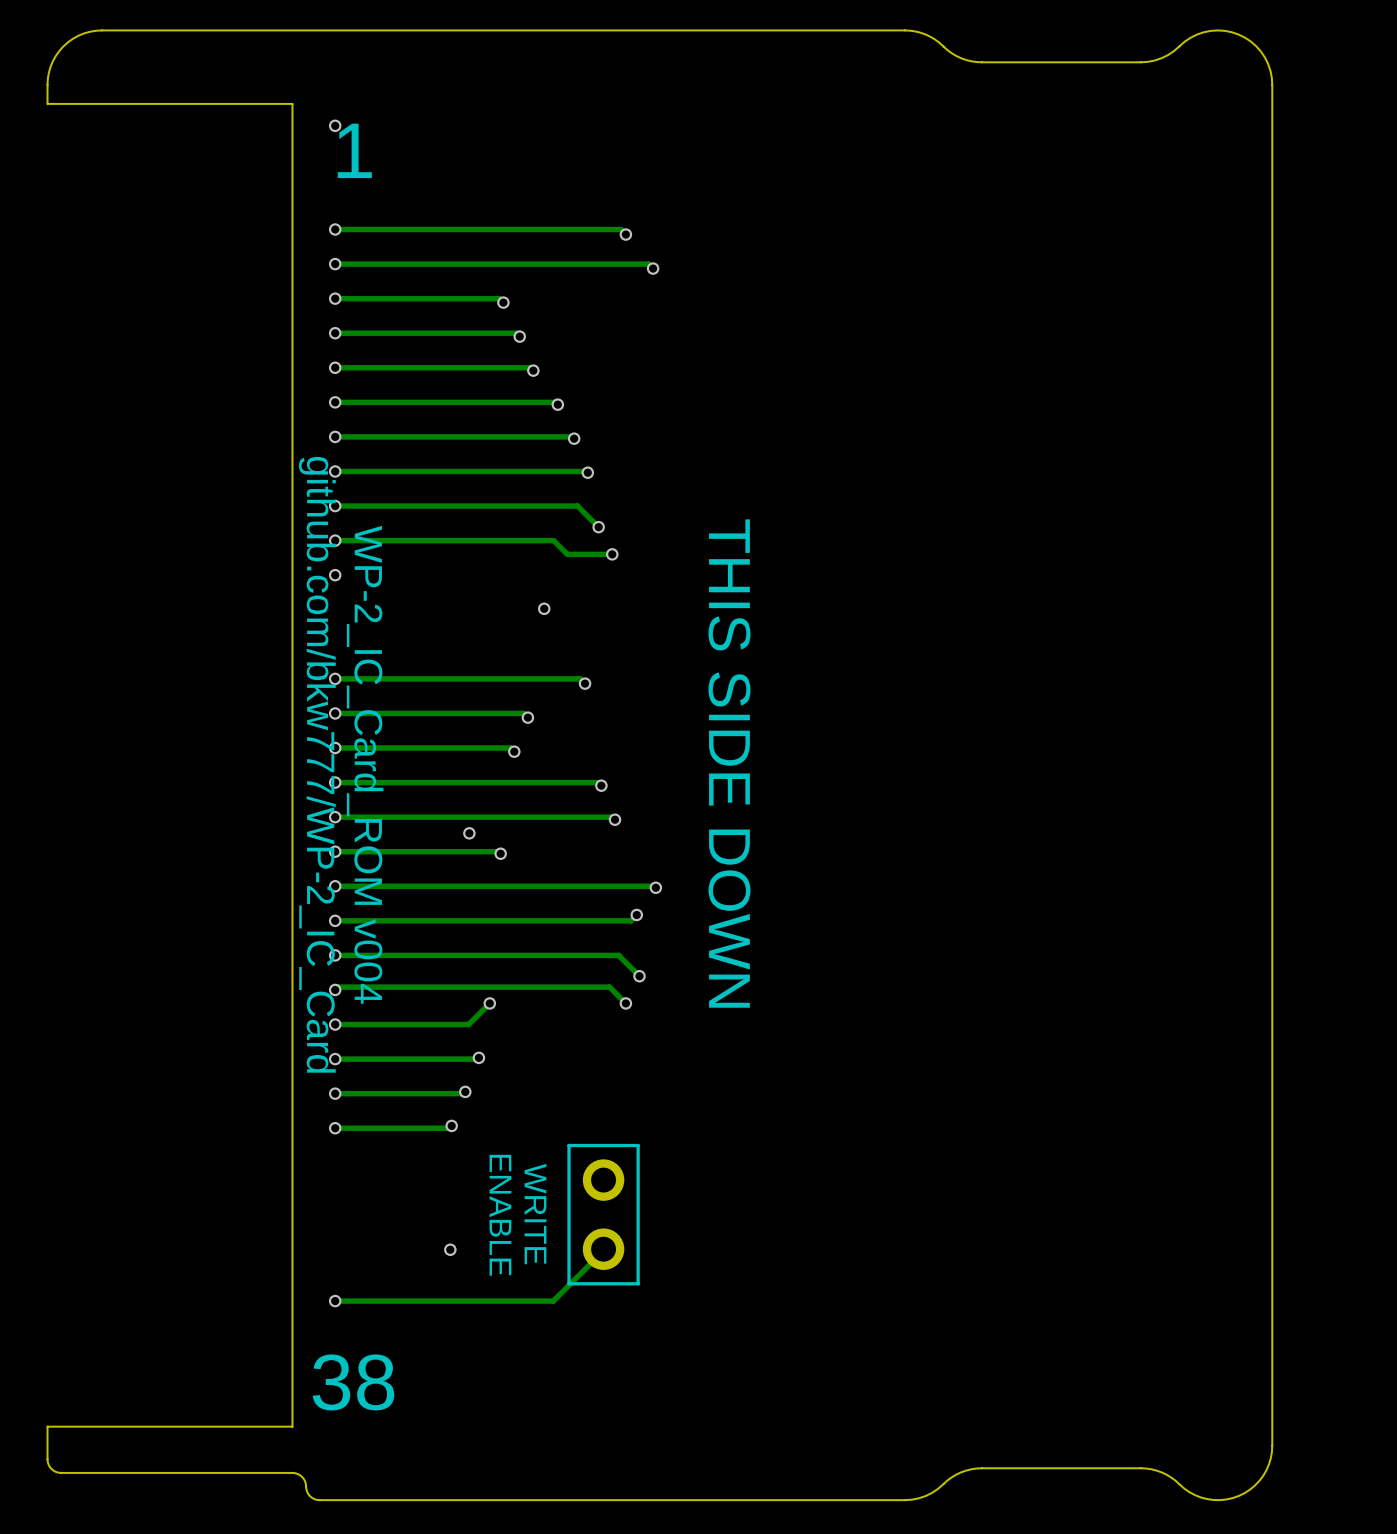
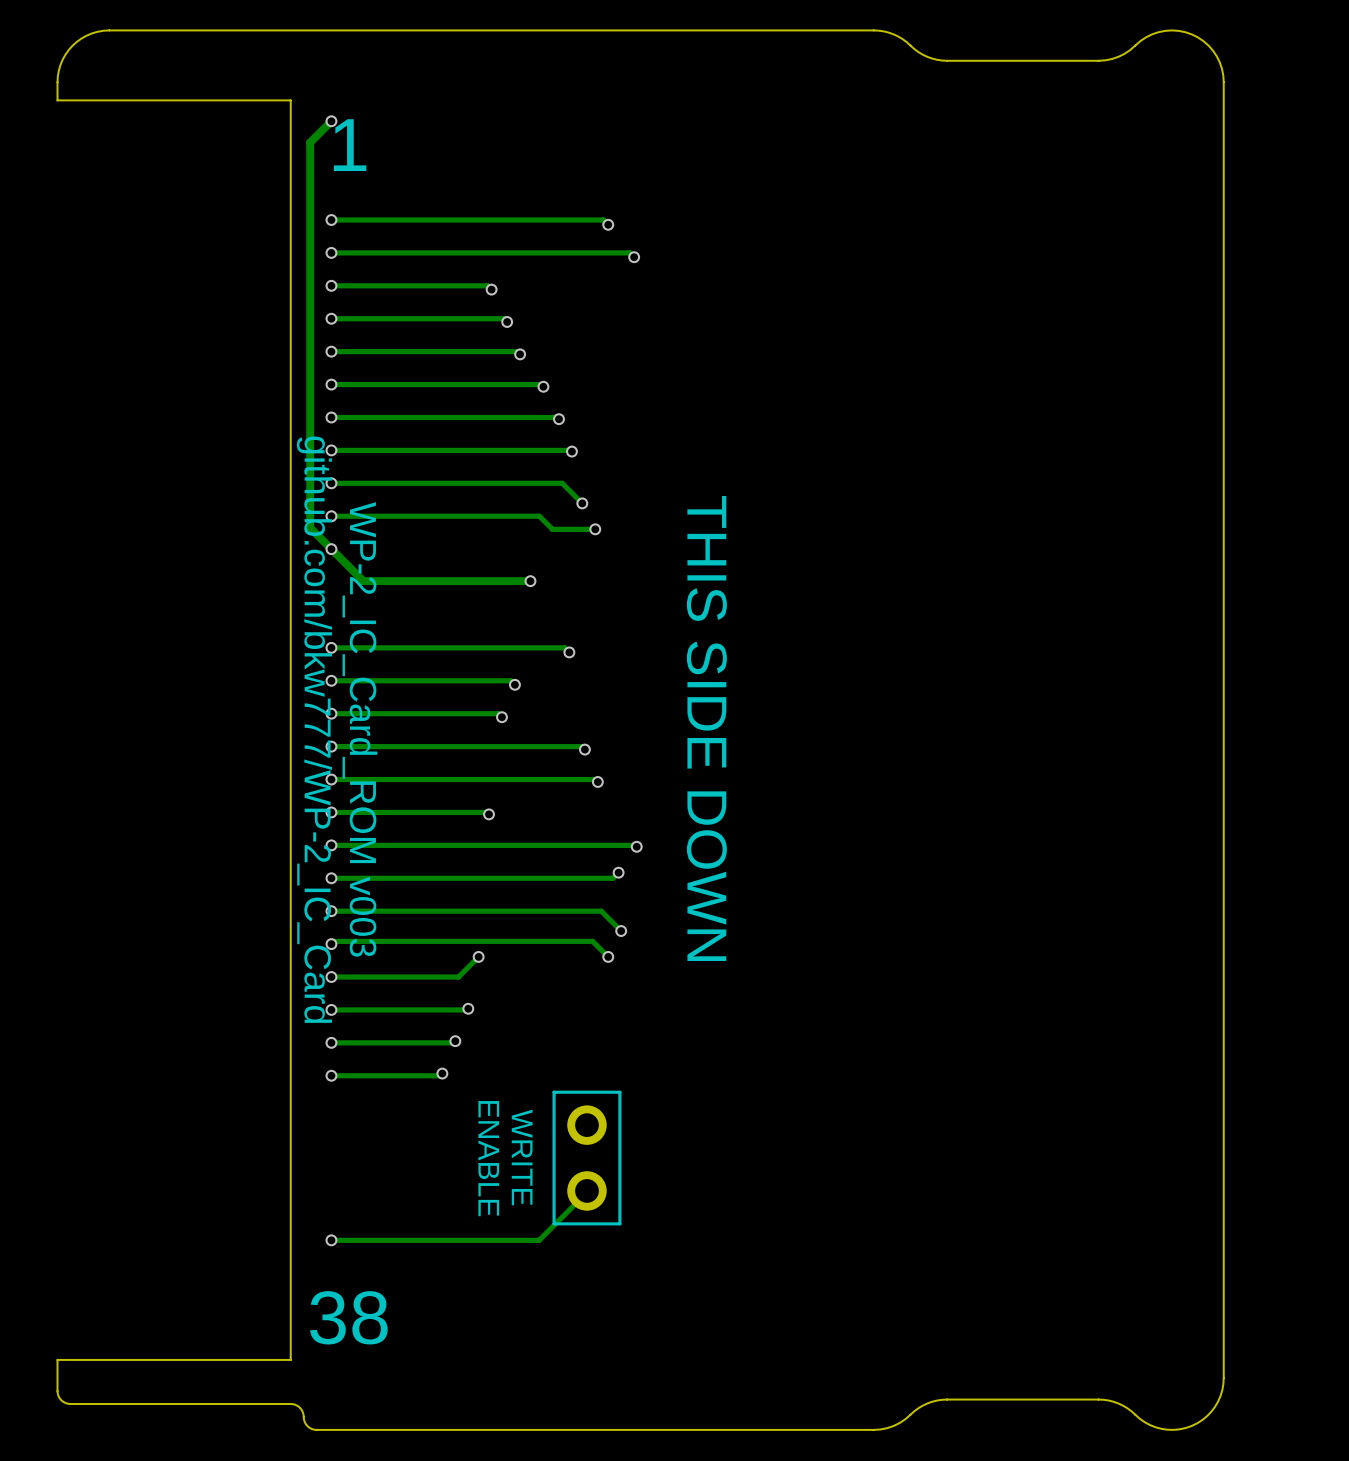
track: none -> (331, 121) (310, 142) (310, 527) (363, 581) (530, 581)
text: WP-2_IC_Card_ROM v004 (365, 764) -> WP-2_IC_Card_ROM v003 (359, 729)
via: (469, 833) -> none
via: (450, 1249) -> none

